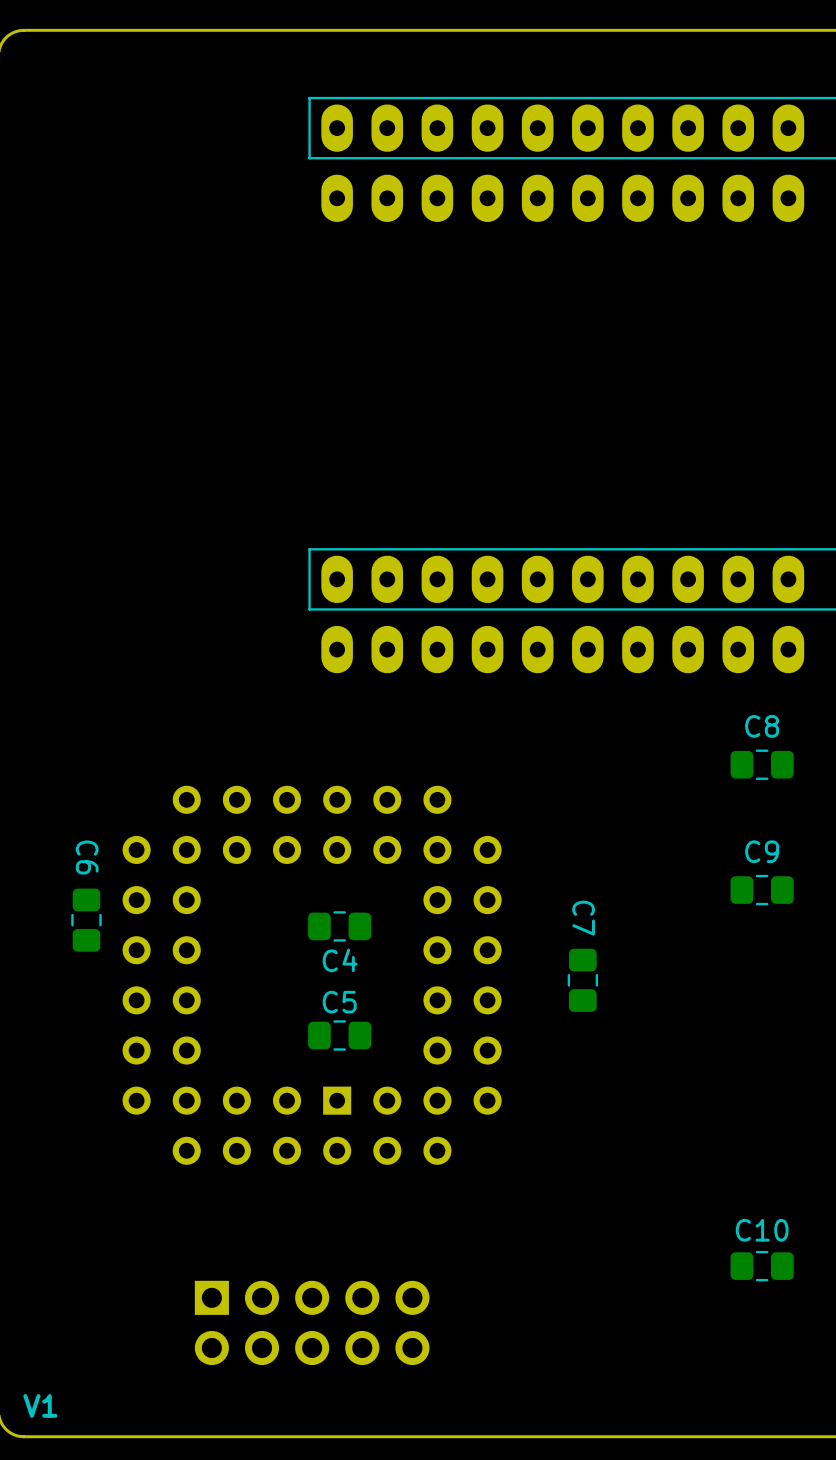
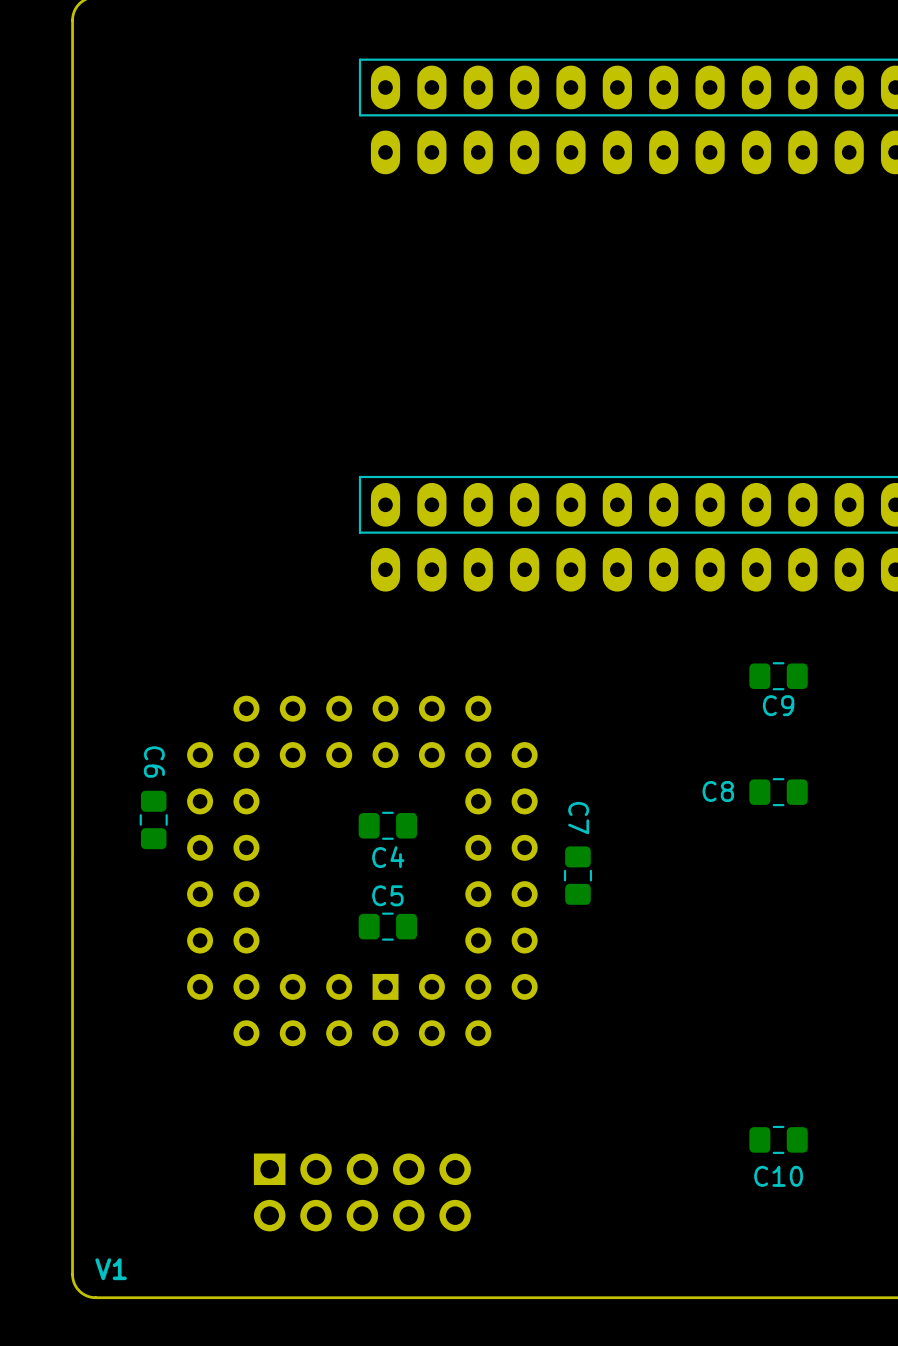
C8 name: C8 (762, 726) -> C9 (778, 705)
C9 name: C9 (762, 851) -> C8 (718, 791)
C7 position: (582, 980) -> (577, 875)
C10 name position: C10 (762, 1230) -> C10 (778, 1176)

